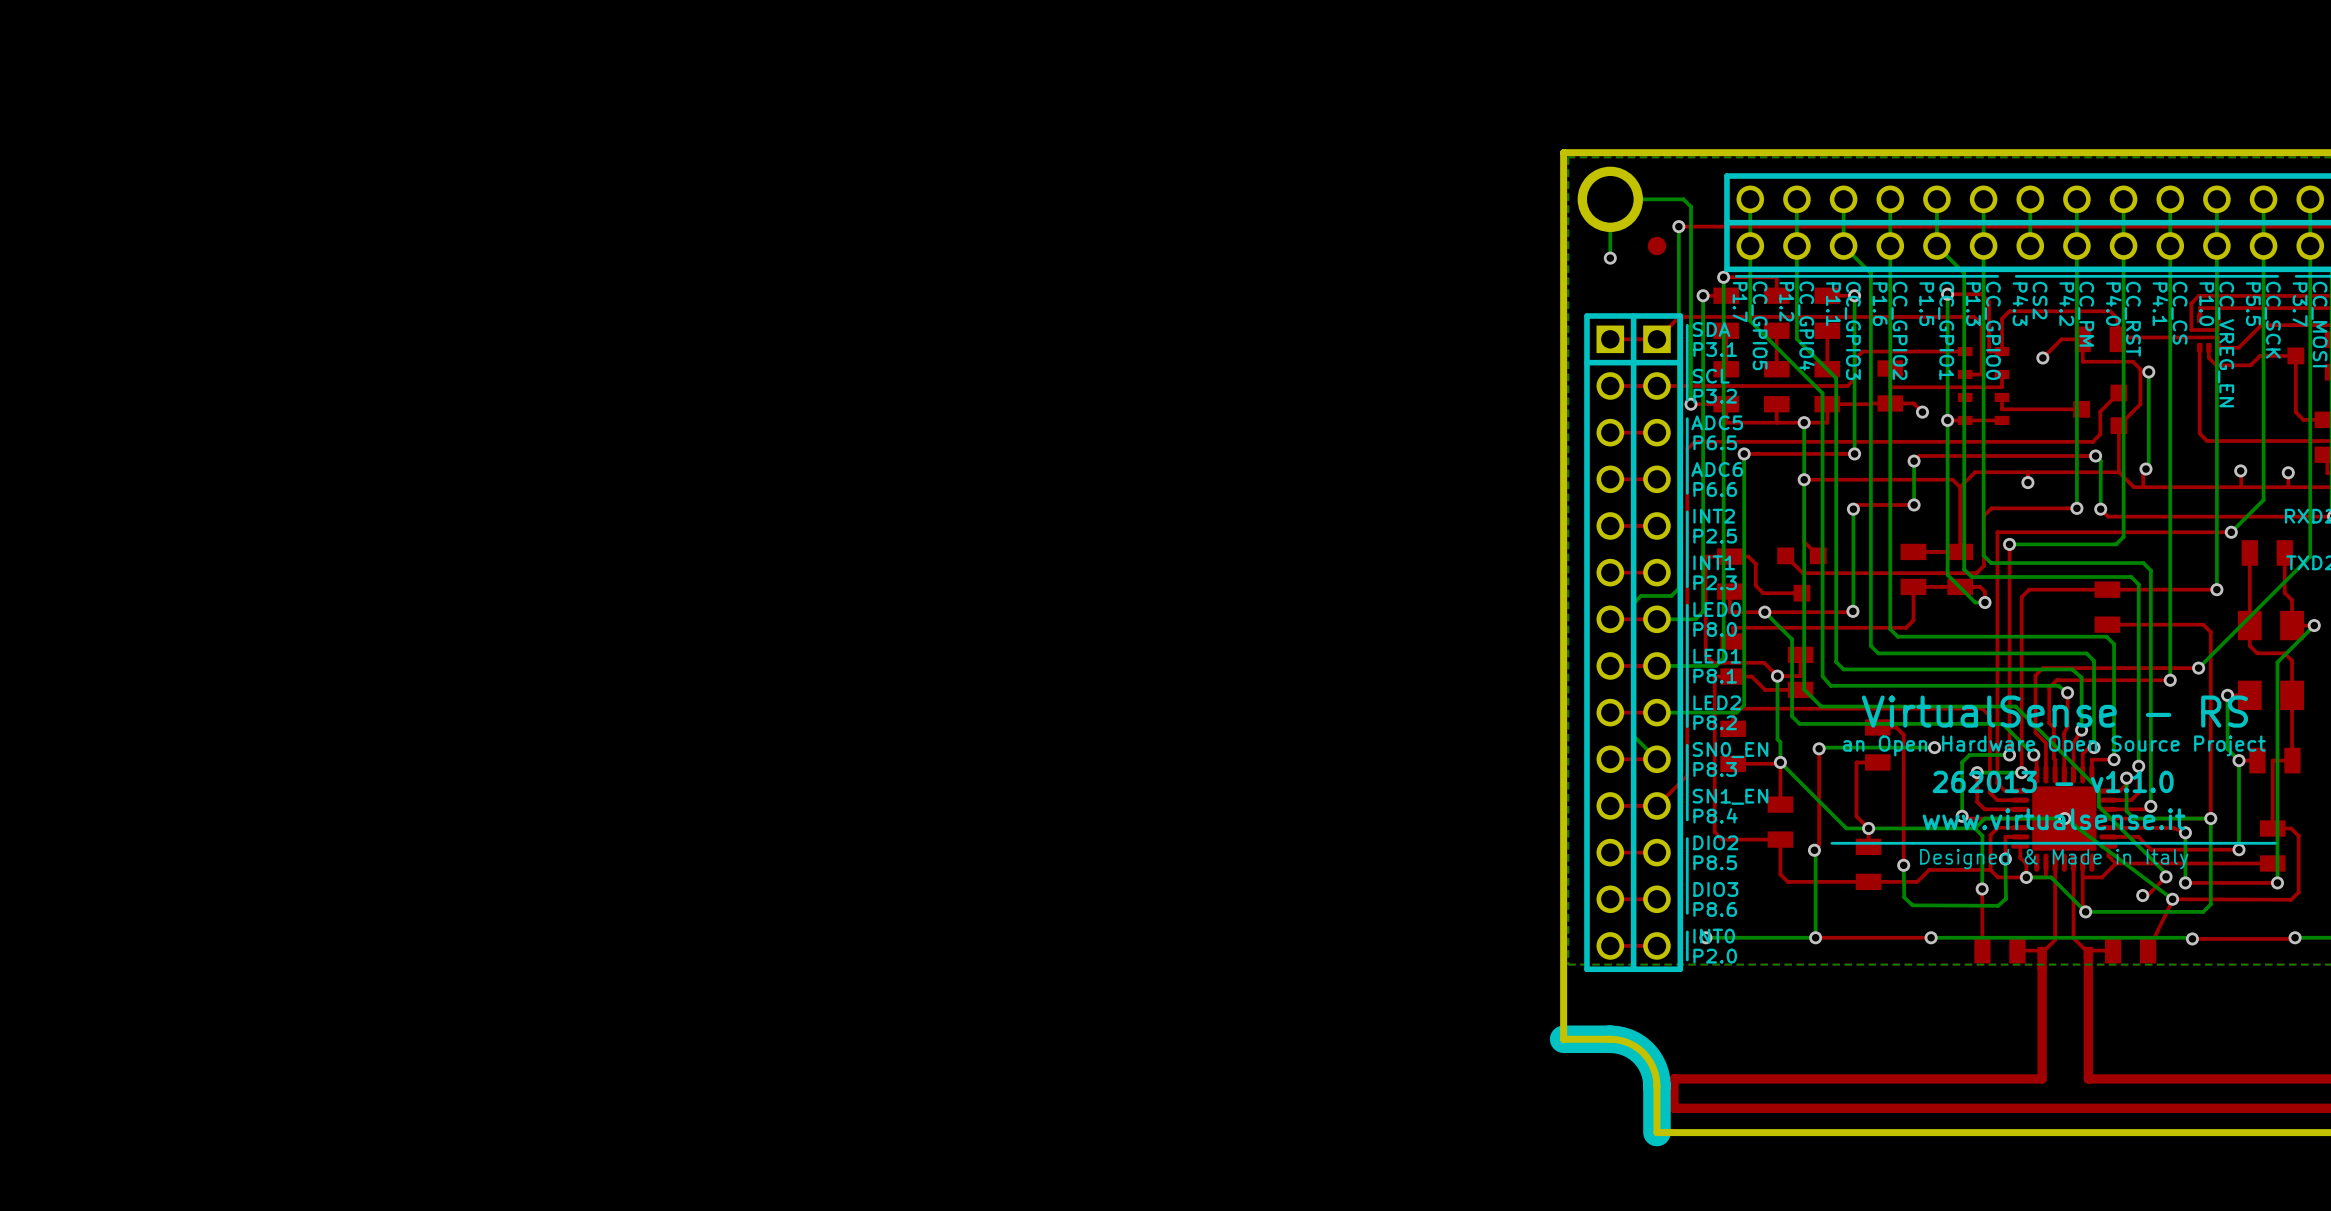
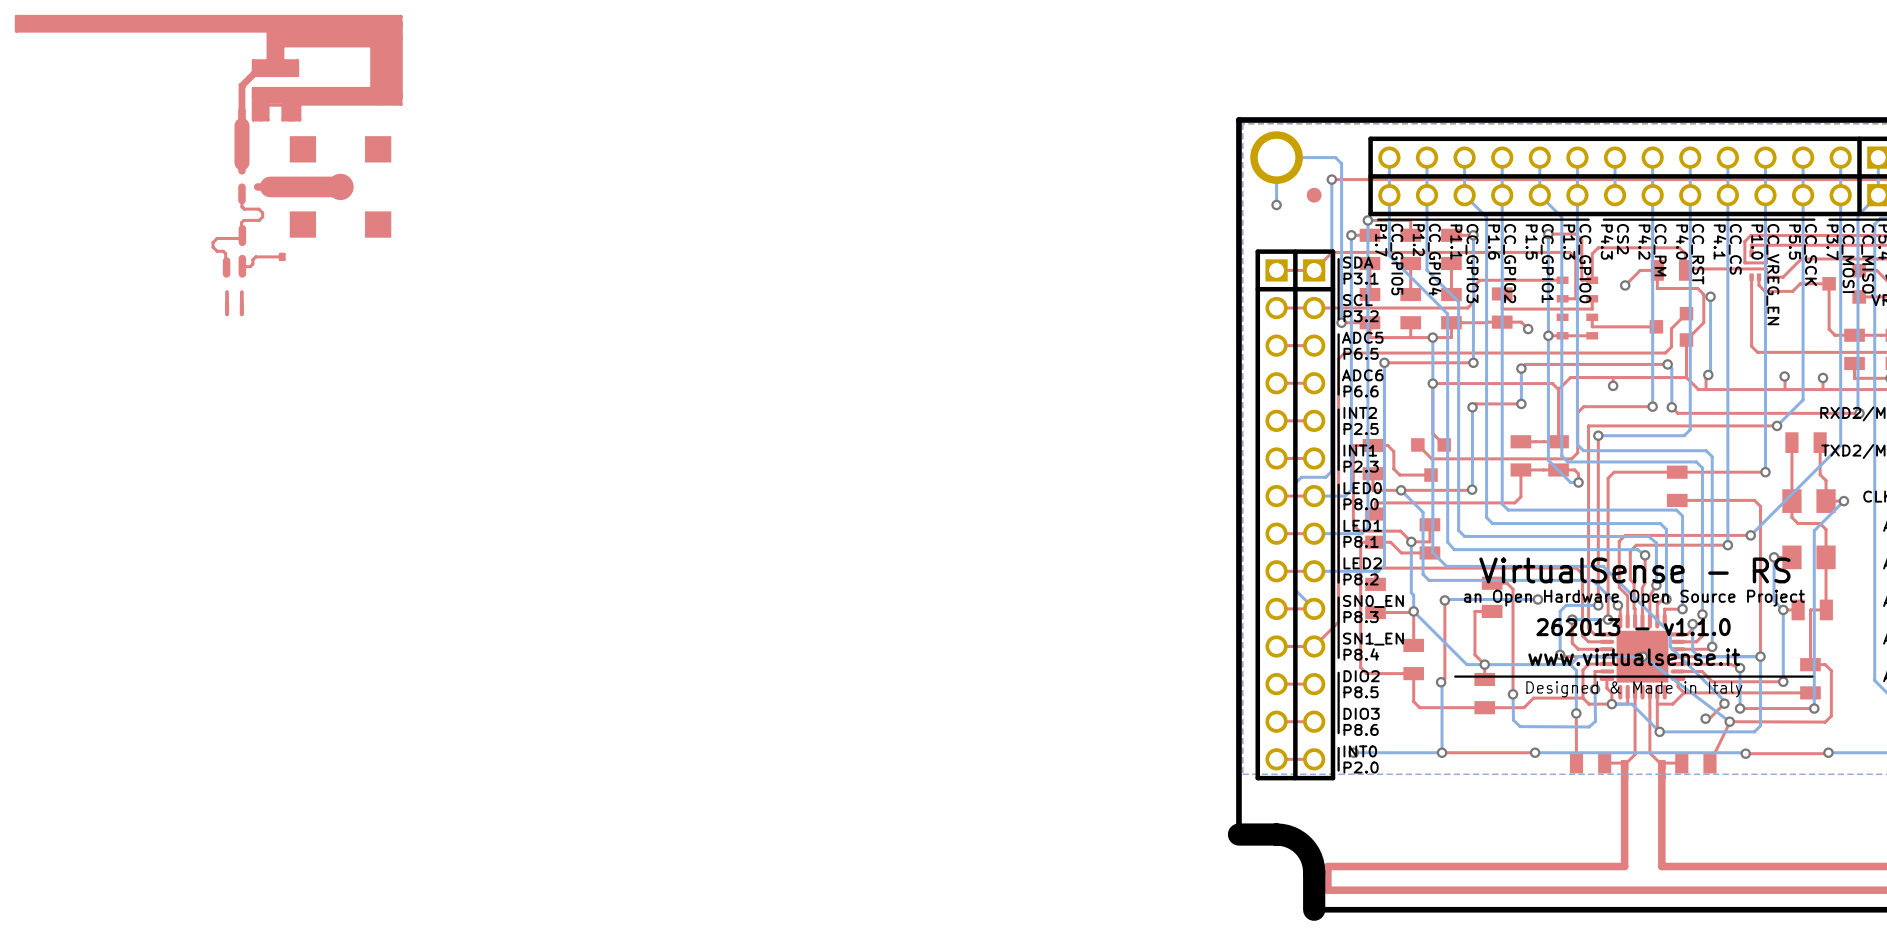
part: none -> (208, 68)
part: none -> (340, 186)
part: none -> (281, 211)

